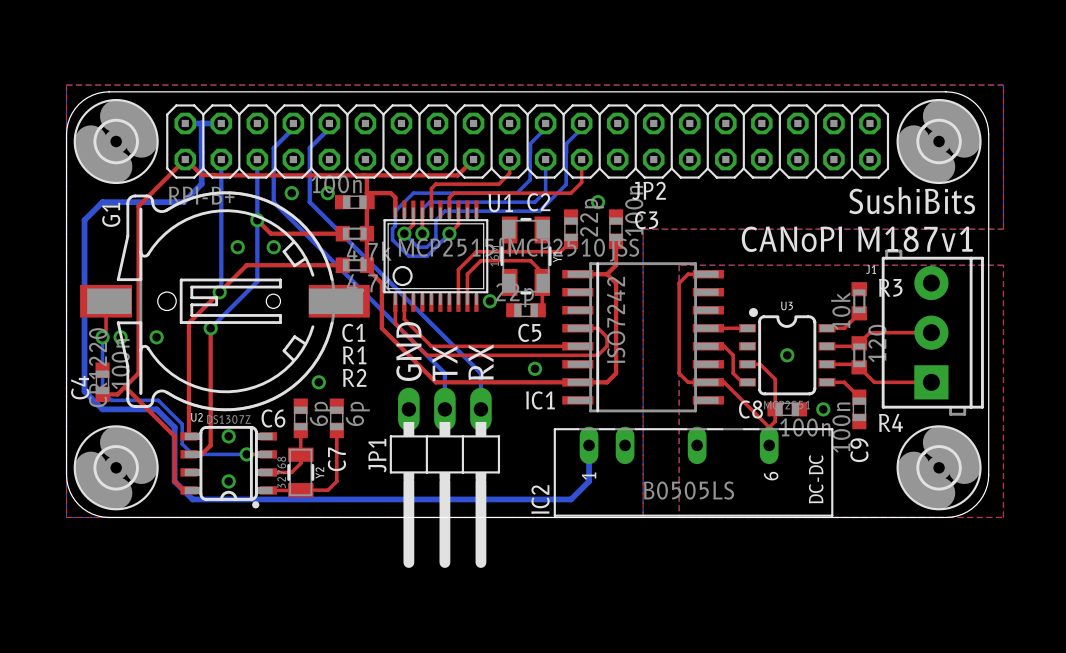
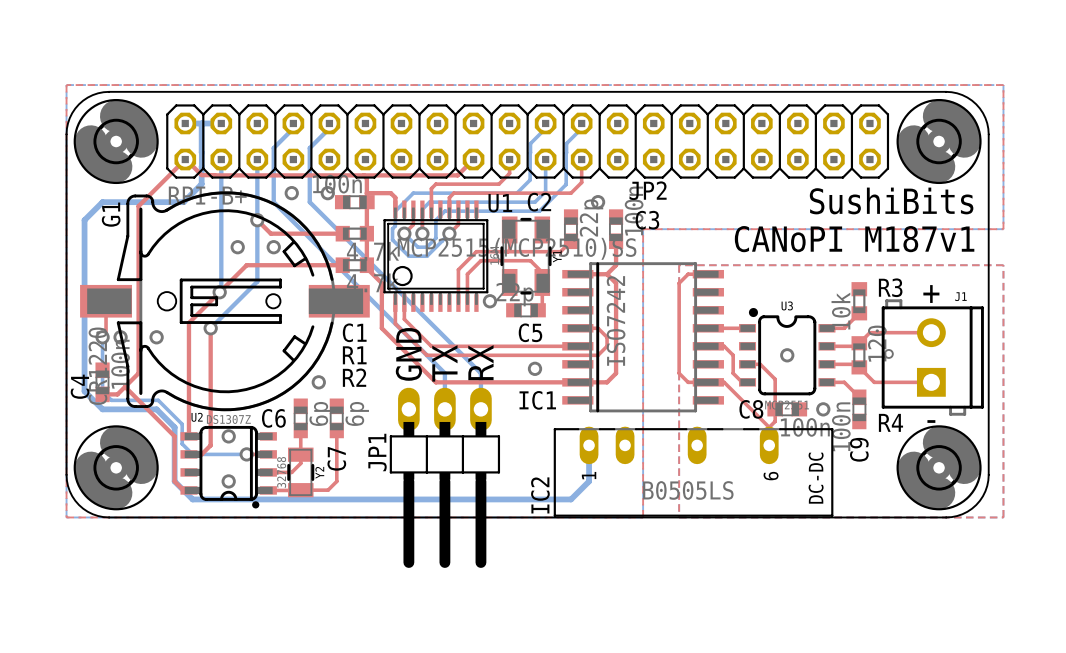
J1 footprint: [881, 249, 984, 416] -> [881, 299, 984, 416]
J1 name position: J1 (871, 269) -> J1 (960, 296)
text: none -> + (931, 294)
text: none -> - (931, 421)

